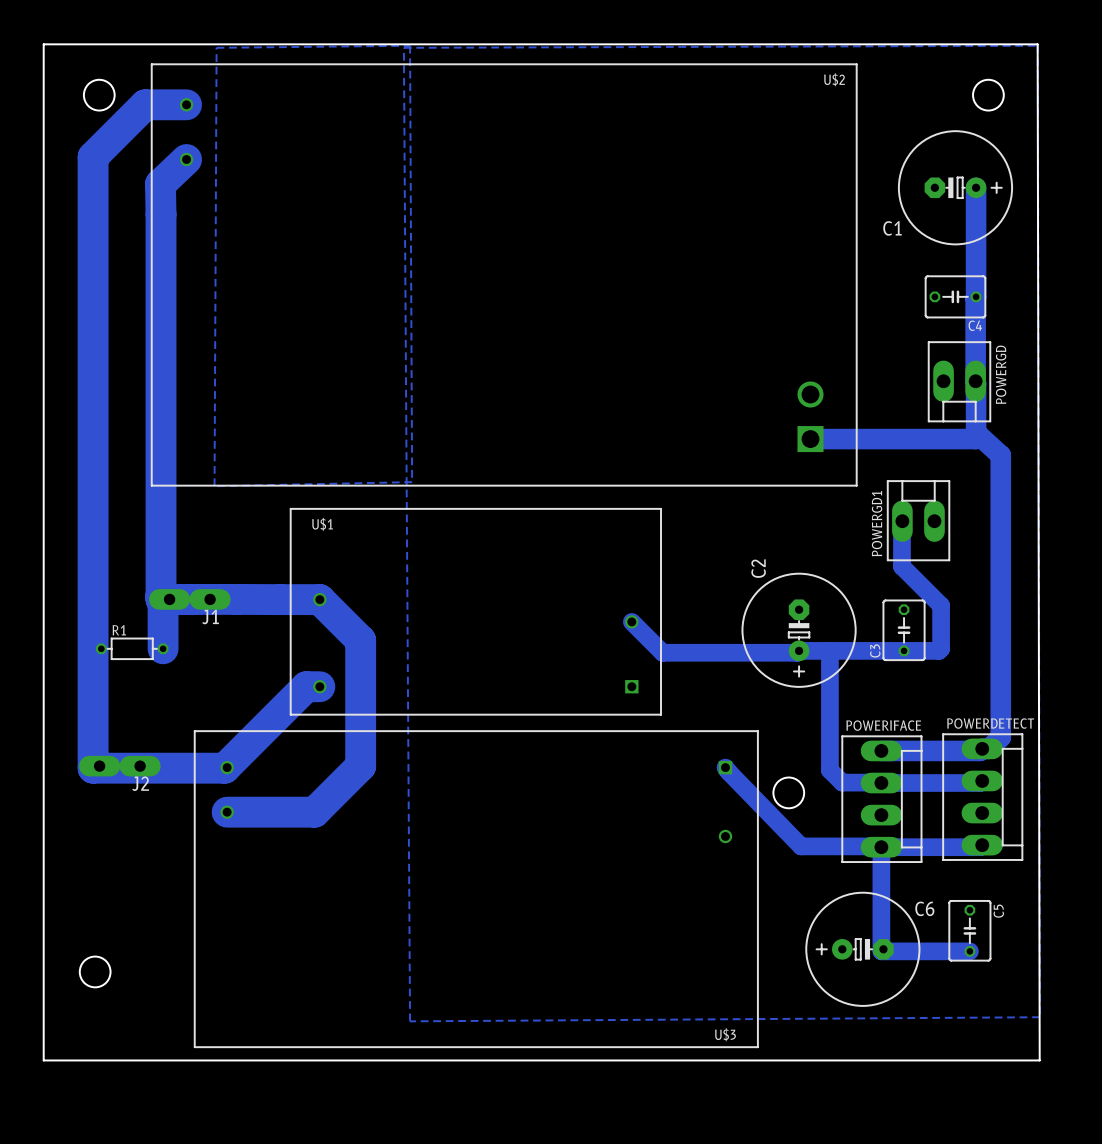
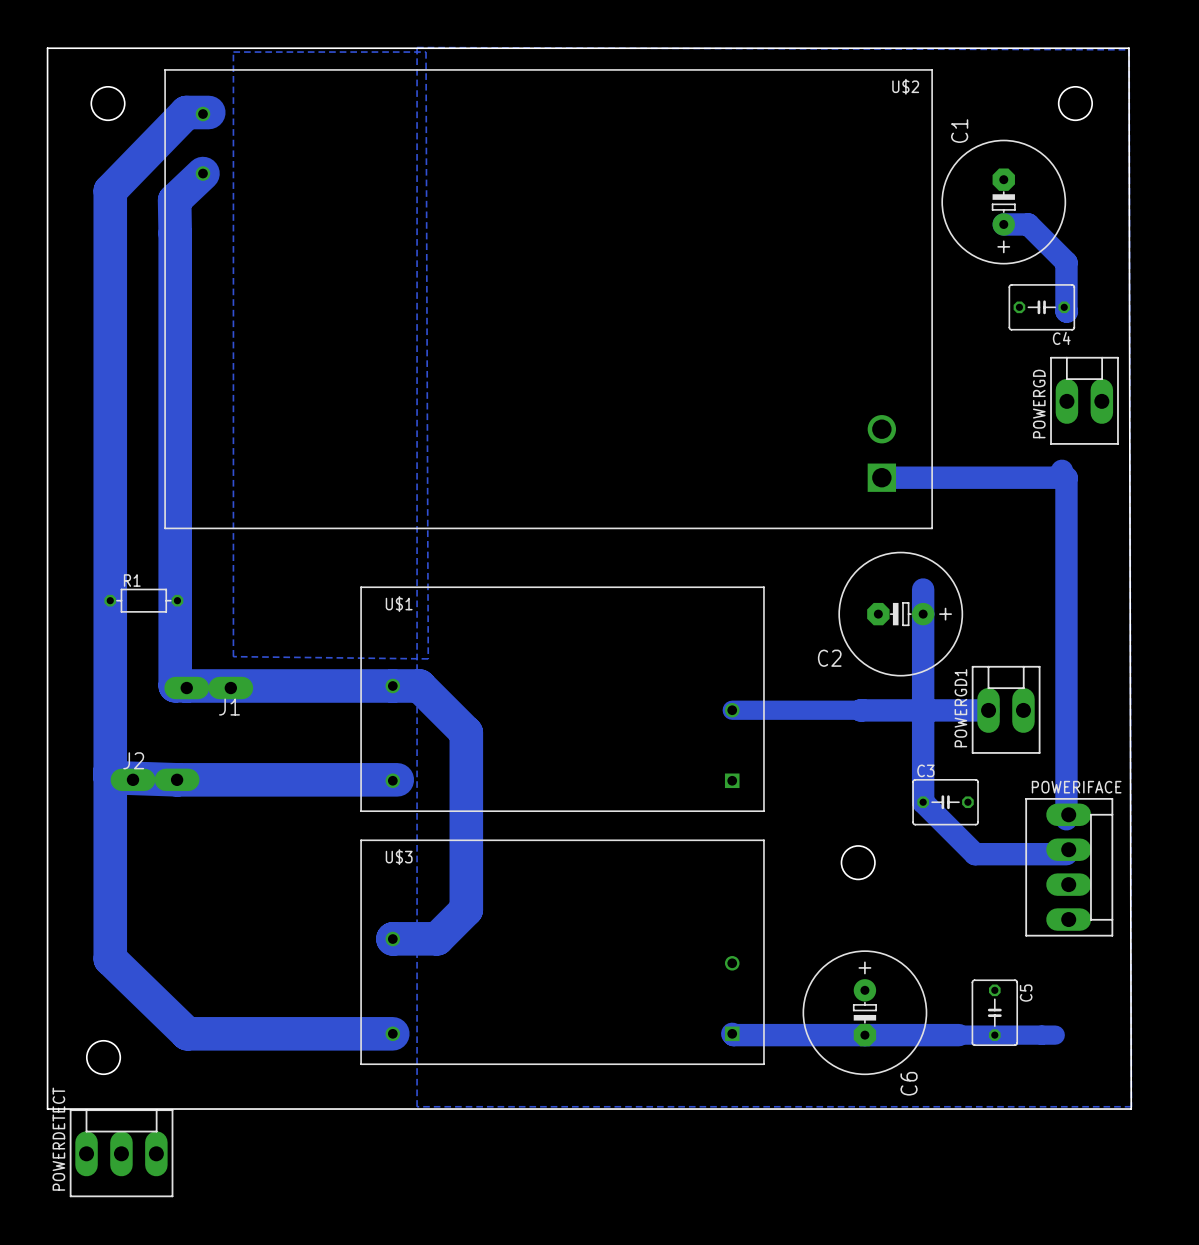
board edge: (1037, 44) (1039, 1060) (43, 1060) (43, 1019) -> (1128, 48) (1131, 1109) (47, 1109)
bottom zone outline: (410, 45) (216, 47) (214, 486) (412, 482) (410, 45) -> (233, 52) (233, 656) (428, 658) (426, 52) (233, 52)
bottom zone outline: (1037, 45) (403, 47) (410, 1021) (1039, 1017) -> (1129, 49) (417, 47) (417, 1106) (1131, 1106)
bottom track: none -> (208, 112) (186, 112) (110, 190) (110, 958) (187, 1033) (392, 1033)
bottom track: (186, 104) (145, 104) (93, 156) (93, 768) (224, 768) (306, 686) (319, 686) -> none
C1 rotation: 0° (955, 187) -> 90° clockwise (1003, 202)
bottom track: (976, 187) (976, 432) (1000, 455) (1000, 737) (989, 748) (982, 748) (980, 750) (881, 750) -> none
bottom track: none -> (1003, 224) (1028, 224) (1066, 262) (1066, 311)
C4 position: (955, 296) -> (1041, 307)
POWERGD rotation: 0° (959, 381) -> 180° (1084, 400)
bottom track: none -> (1066, 477) (1066, 819)
POWERGD1 position: (918, 520) -> (1006, 709)
bottom track: (902, 521) (901, 566) (941, 605) (941, 648) (939, 650) (799, 650) (792, 652) -> (988, 710) (860, 710) (862, 710)
bottom track: none -> (923, 589) (923, 802) (975, 854) (1066, 854)
bottom track: (161, 595) (163, 597) (163, 648) -> none
bottom track: none -> (175, 652) (175, 685) (419, 685) (466, 732) (466, 909) (437, 938) (392, 939)
J1 position: (189, 599) -> (208, 688)
bottom track: (194, 599) (161, 599) (319, 599) (360, 640) (360, 766) (314, 812) (227, 812) -> none
U$1 position: (475, 611) -> (562, 699)
bottom track: (631, 621) (662, 652) (673, 652) -> none
C2 rotation: 0° (799, 630) -> 90° counterclockwise (900, 614)
C2 position: (799, 630) -> (900, 614)
C3 rotation: 0° (904, 630) -> 90° clockwise (945, 802)
C3 position: (904, 630) -> (945, 802)
R1 position: (132, 648) -> (143, 600)
bottom track: (829, 650) (829, 770) (842, 782) (980, 783) (982, 780) -> none
bottom track: none -> (110, 777) (177, 779) (397, 779)
POWERDETECT name: POWERDETECT (990, 723) -> POWERIFACE (1076, 787)
U$3 footprint: [194, 730, 759, 1048] -> [360, 839, 765, 1065]
J2 position: (119, 766) -> (155, 779)
bottom track: (725, 767) (801, 846) (887, 847) -> none
J2 name position: J2 (140, 783) -> J2 (133, 760)
POWERIFACE: (881, 799) -> none
bottom track: (982, 845) (980, 847) (881, 847) (881, 951) -> (732, 1033) (958, 1035)
C5 position: (969, 930) -> (994, 1012)
C6 rotation: 0° (862, 949) -> 90° clockwise (864, 1012)
C6 position: (862, 949) -> (864, 1012)
U$3 name position: U$3 (725, 1034) -> U$3 (399, 857)
POWERDETECT: none -> (121, 1153)

